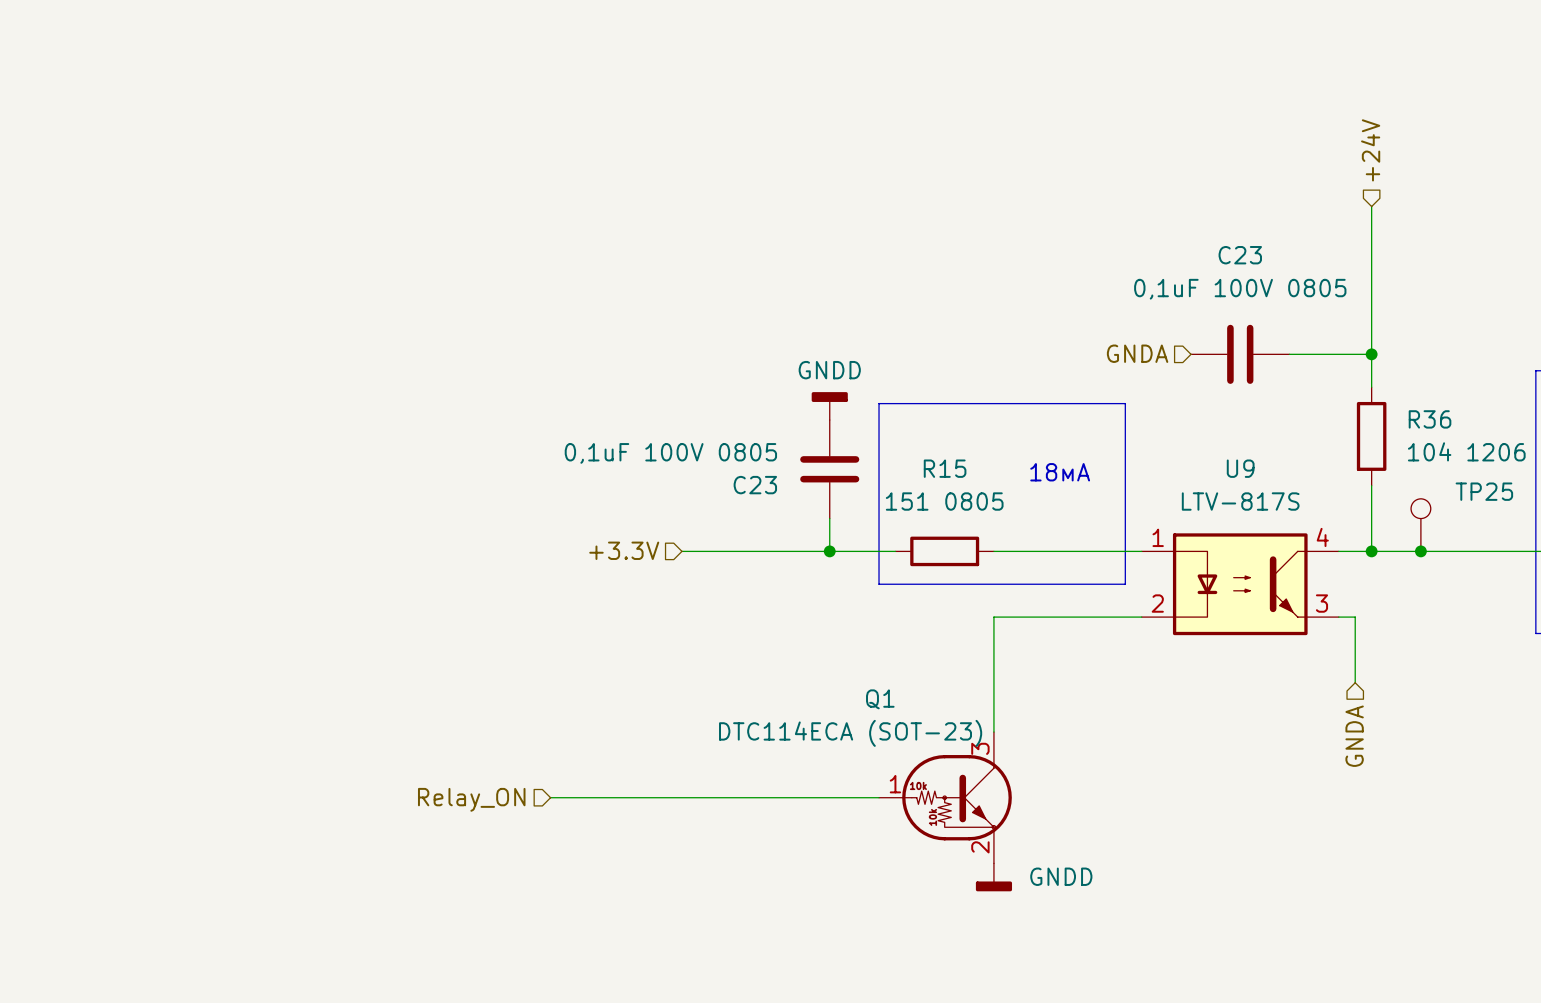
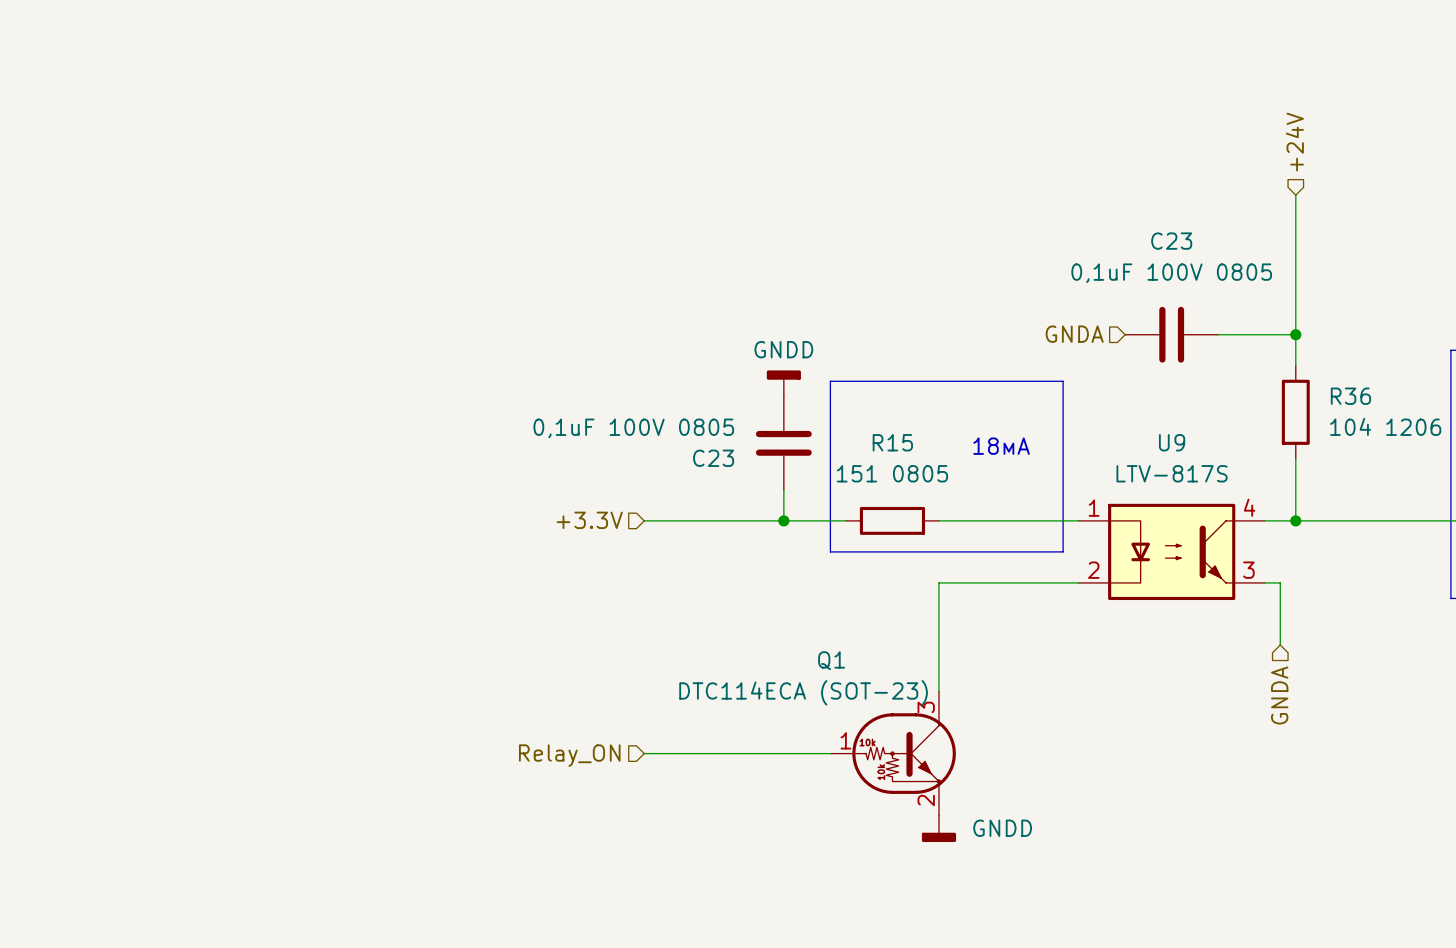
TP25: (1420, 525) -> none
junction: (1420, 551) -> none
wire: (550, 797) (681, 797) -> none
hierarchical label position: Relay_ON (471, 799) -> Relay_ON (569, 755)

